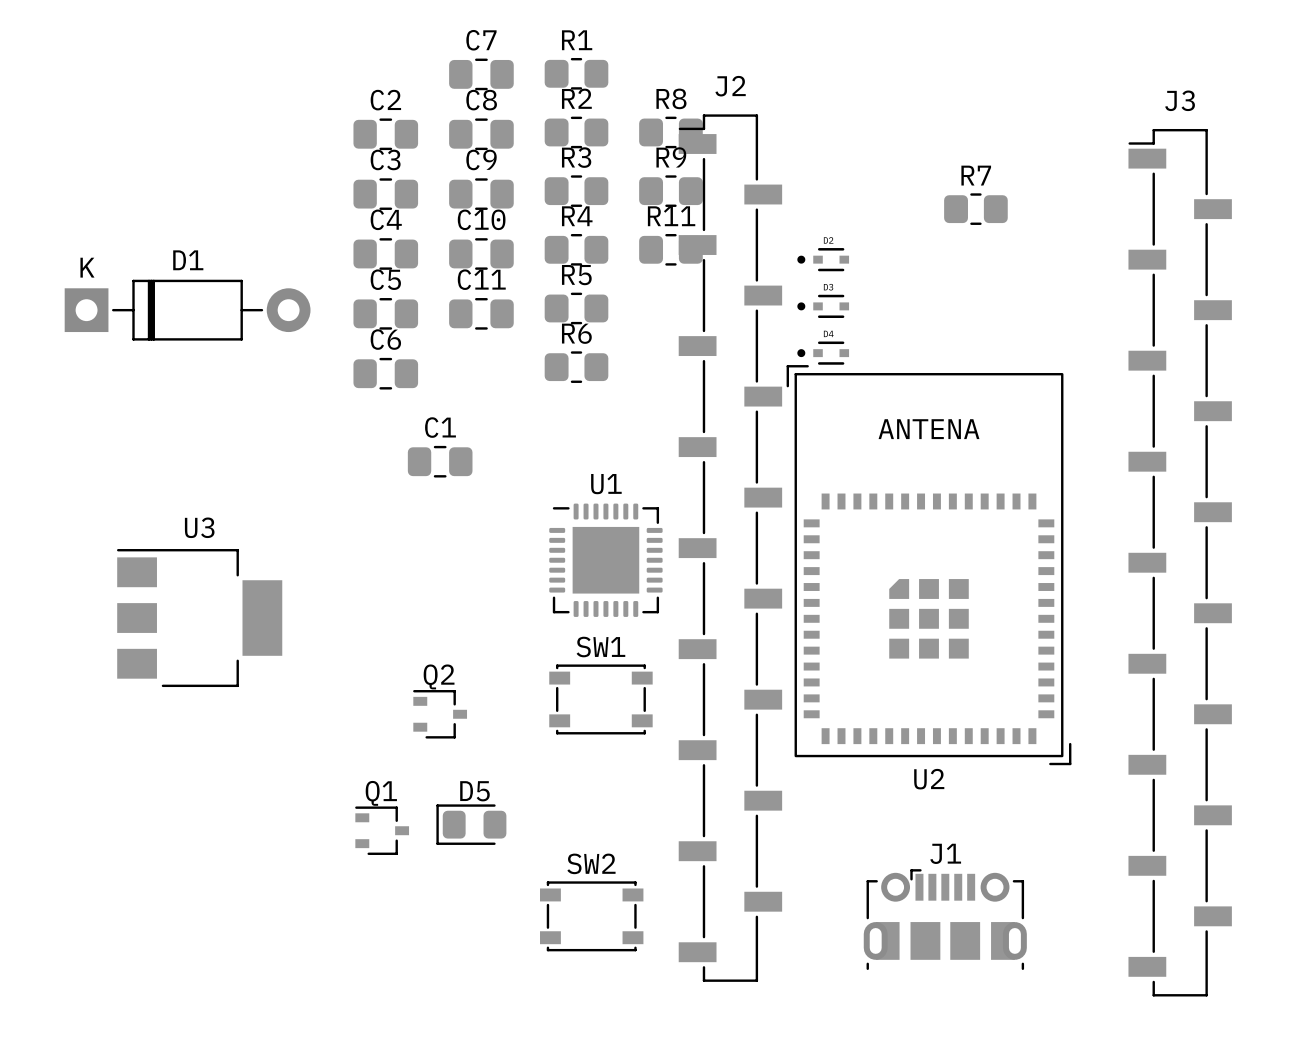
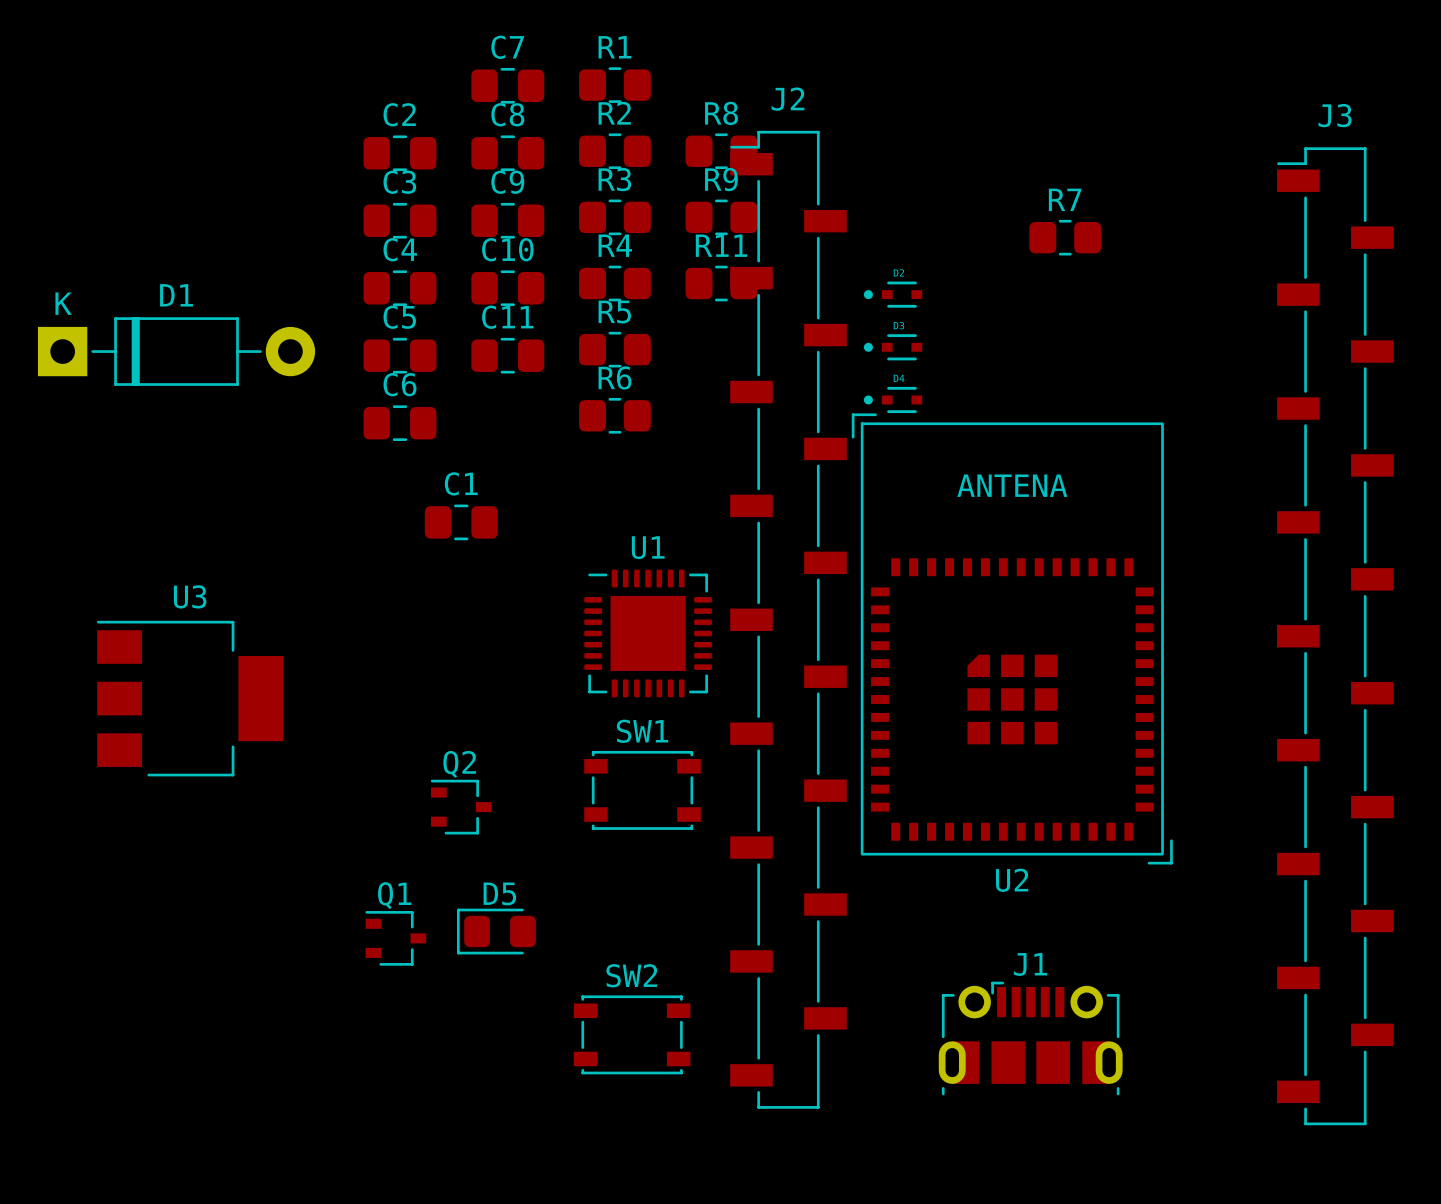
J3 position: (1180, 562) -> (1335, 636)

